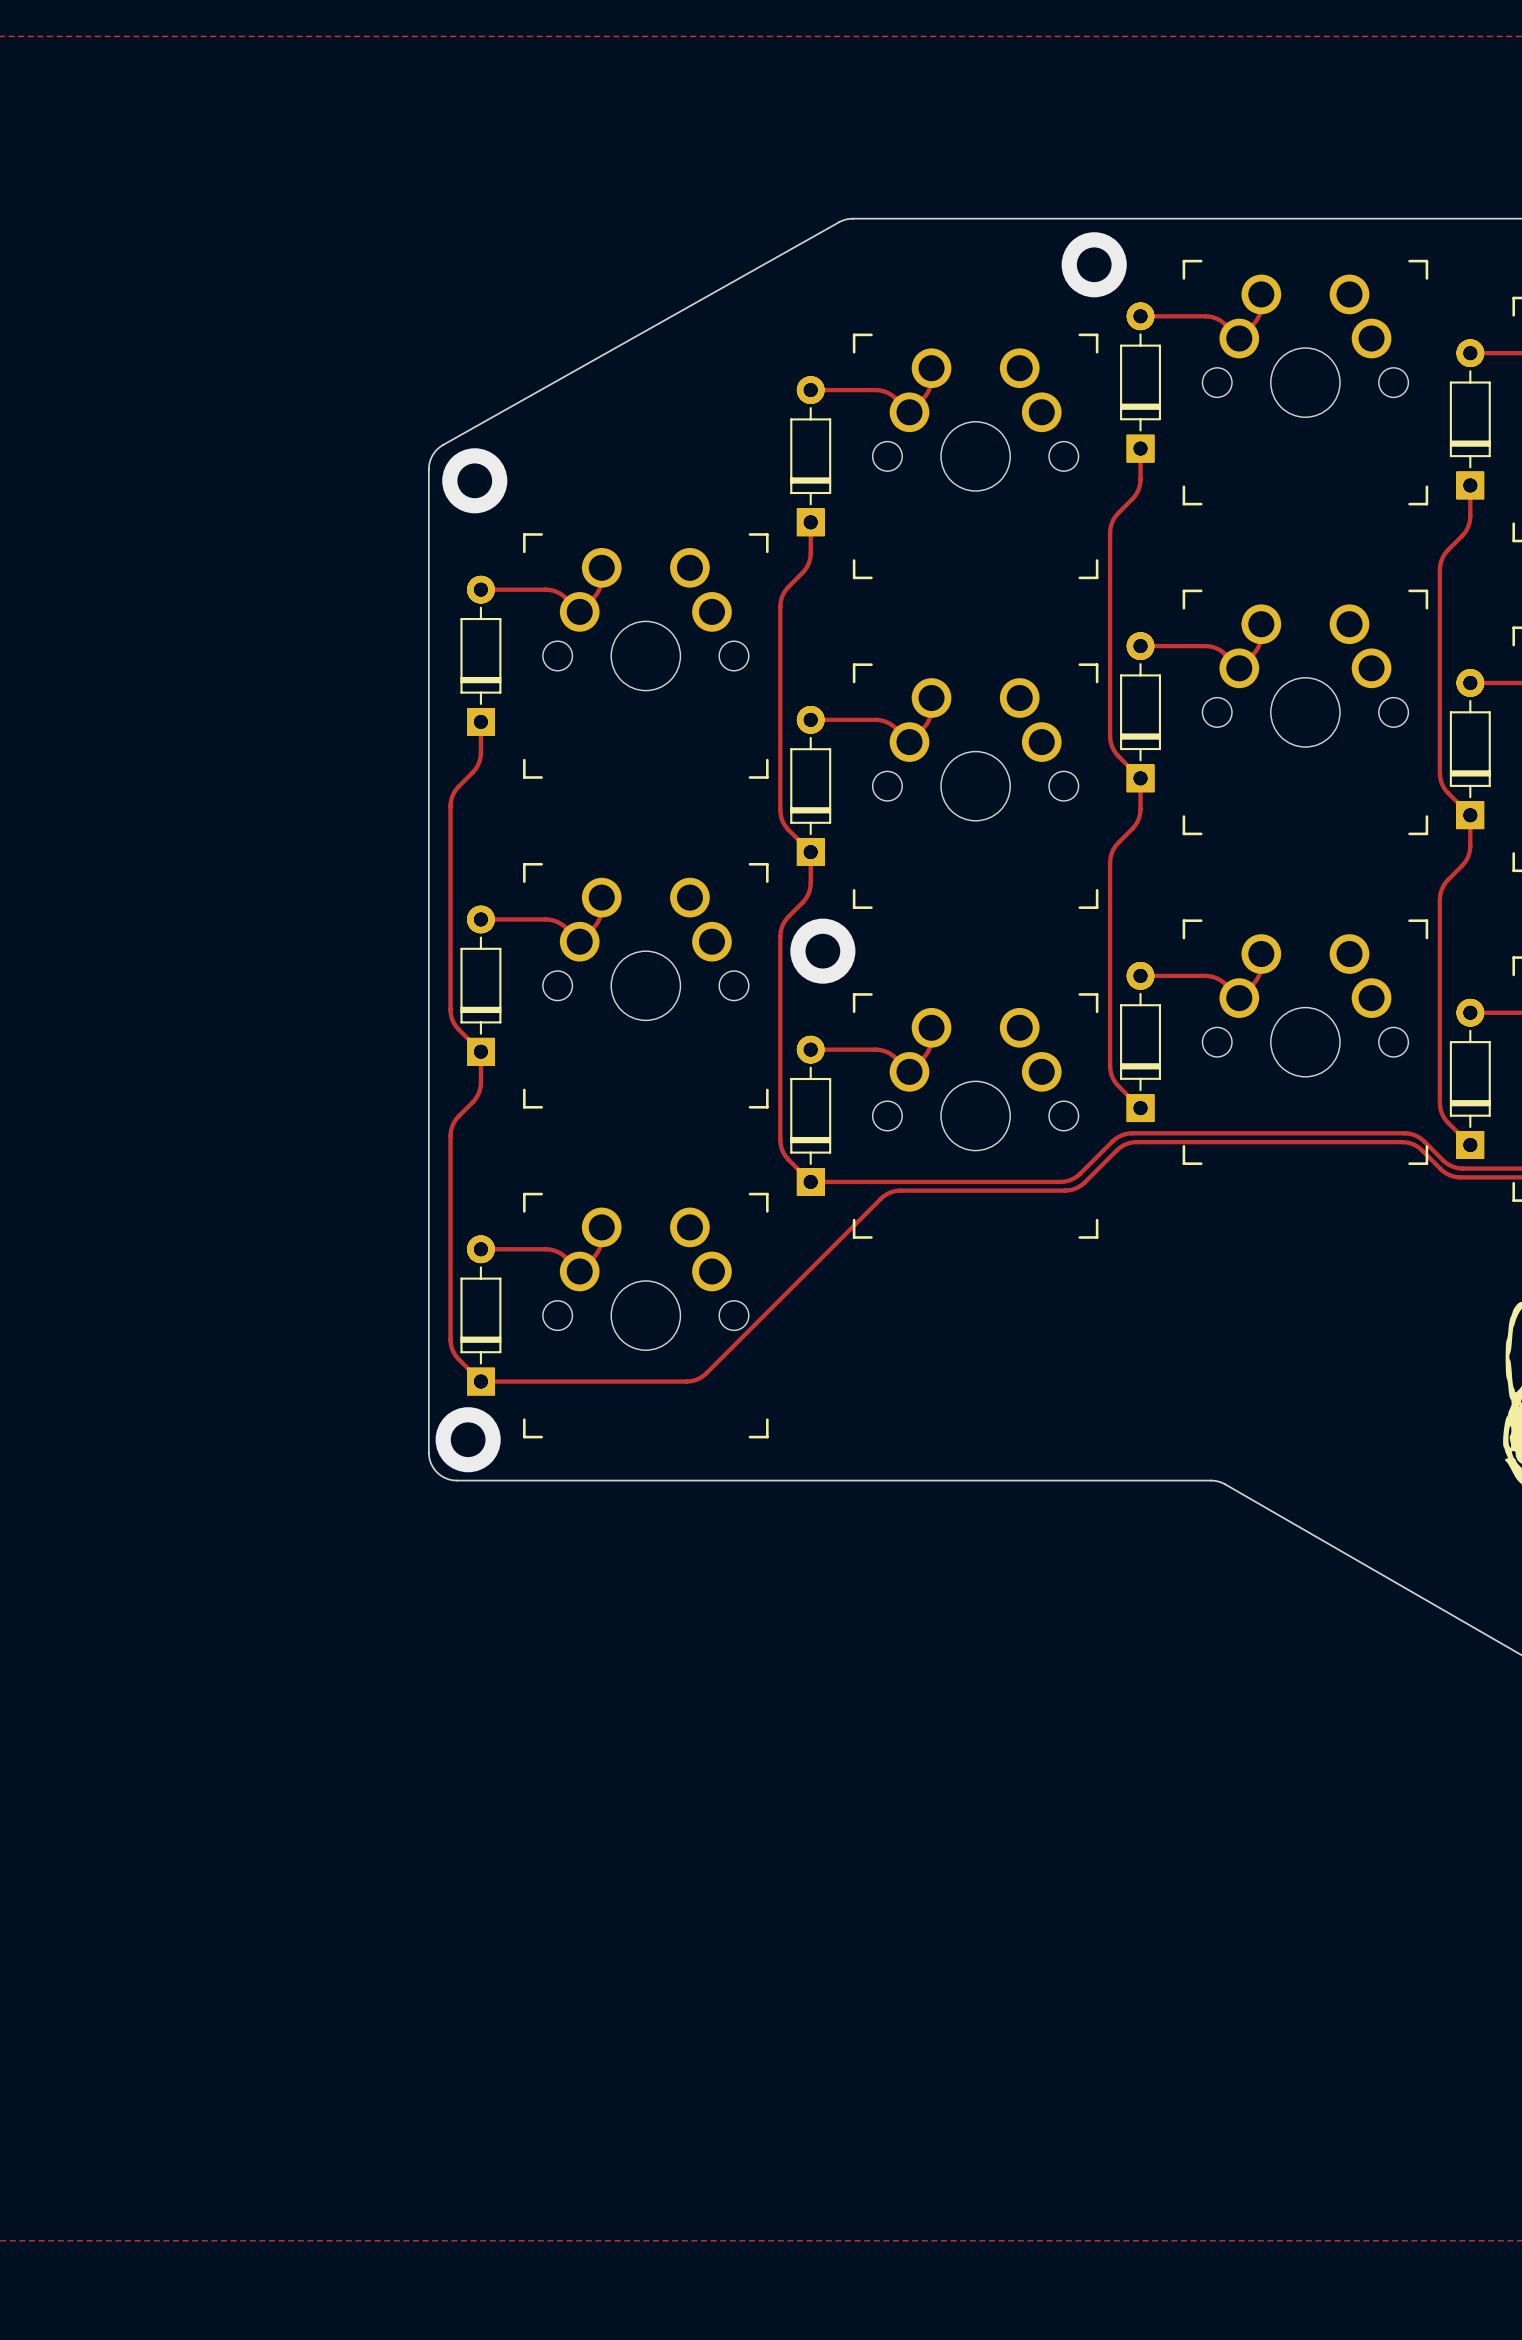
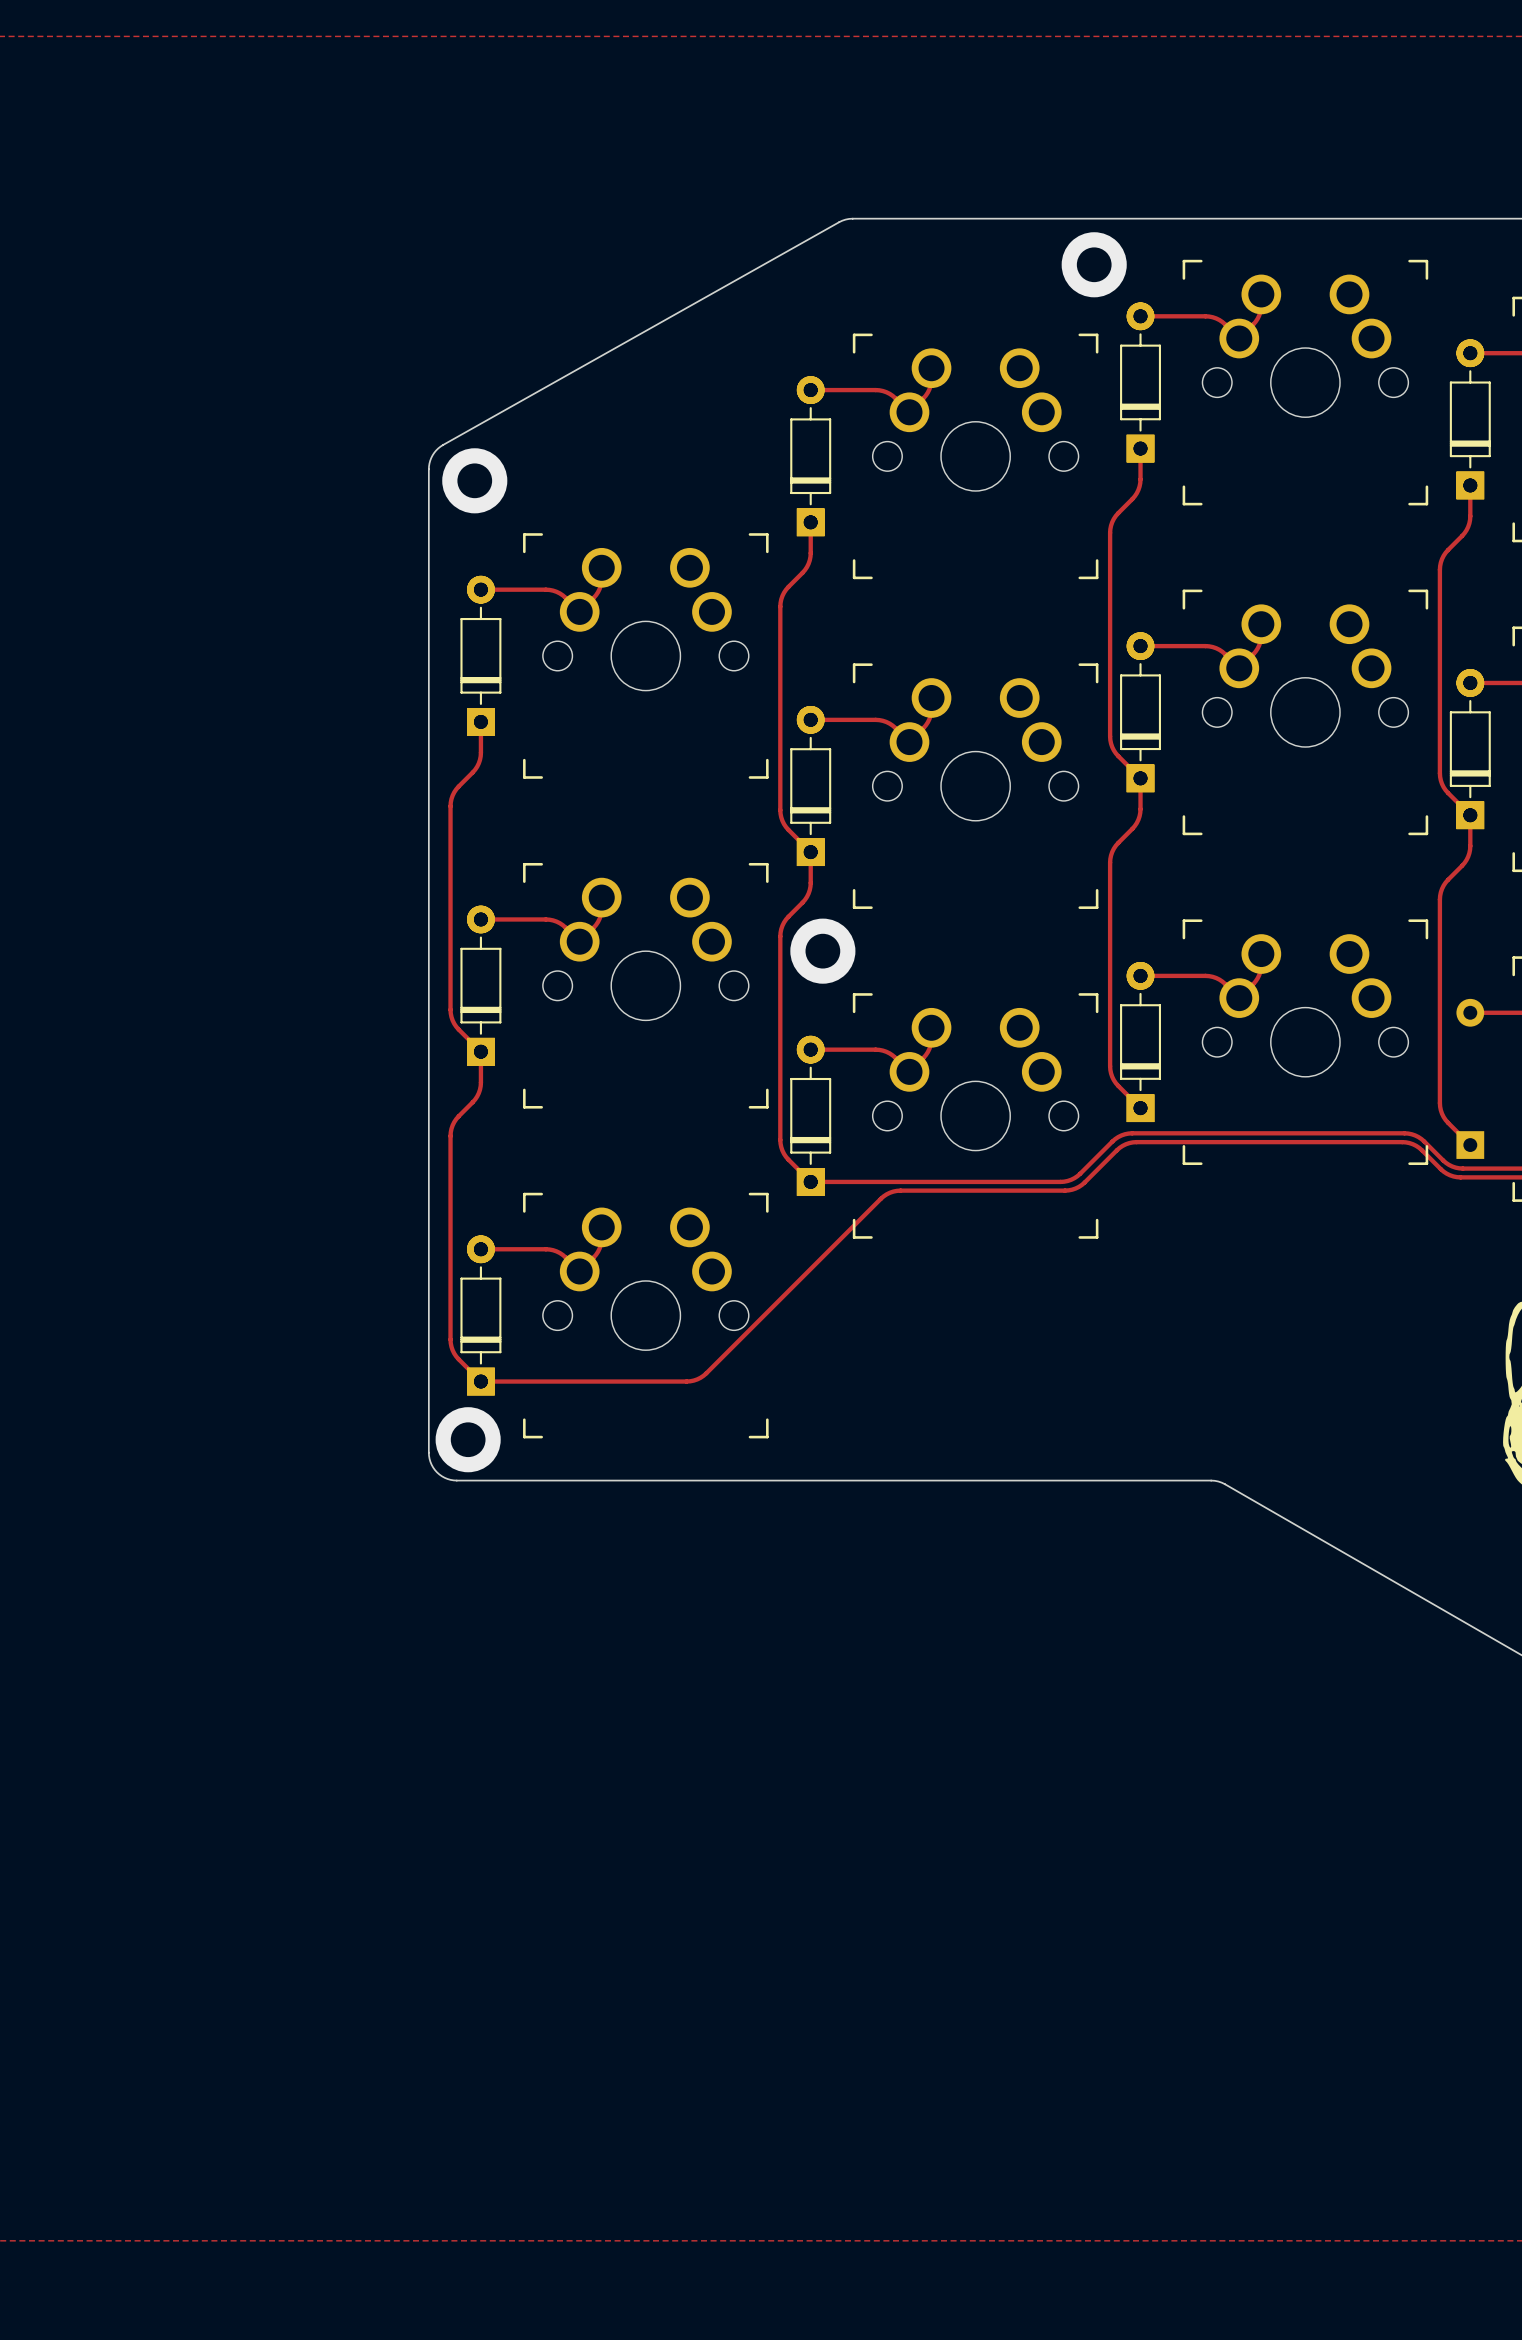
part: (1470, 1078) -> none

